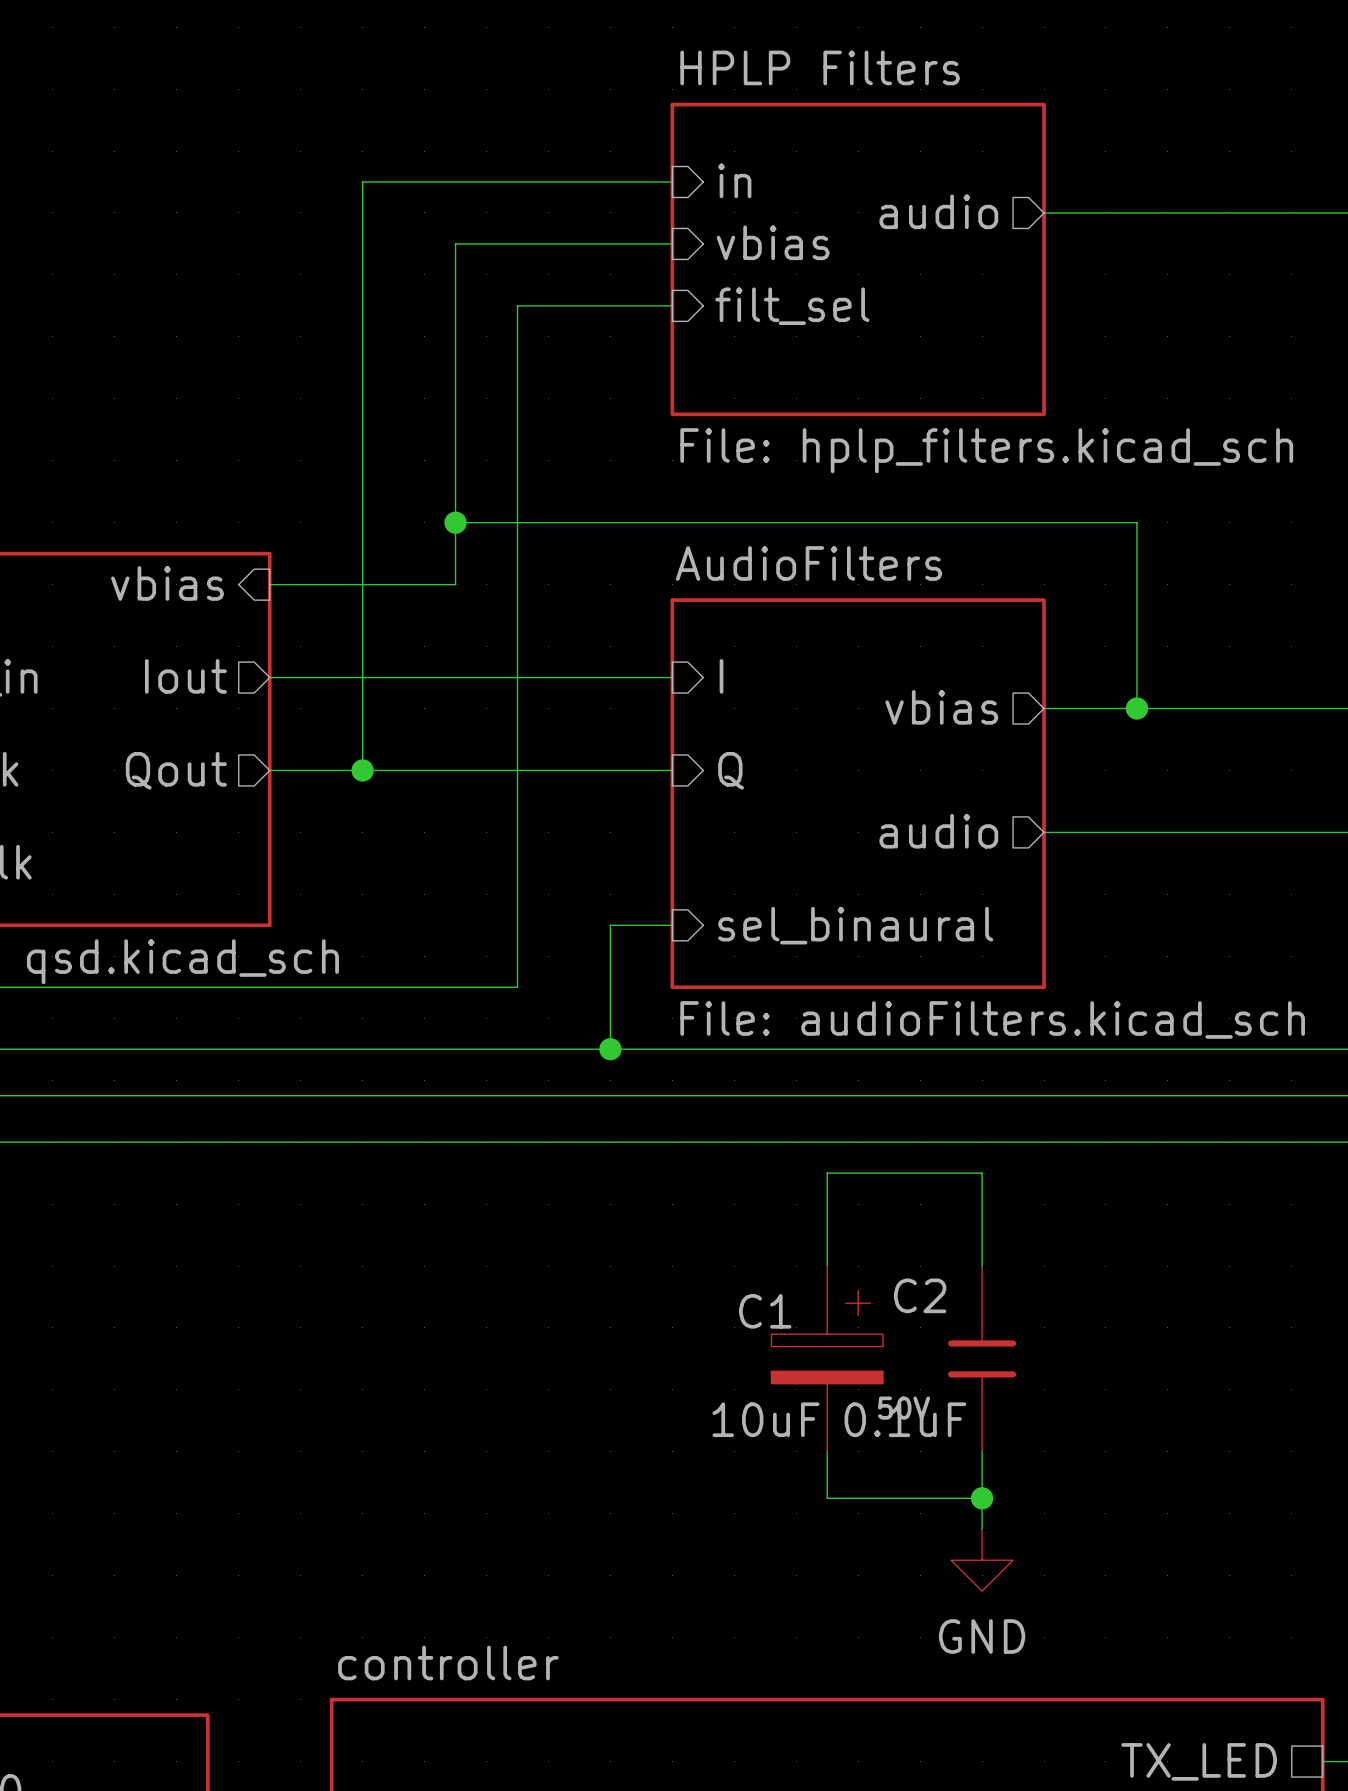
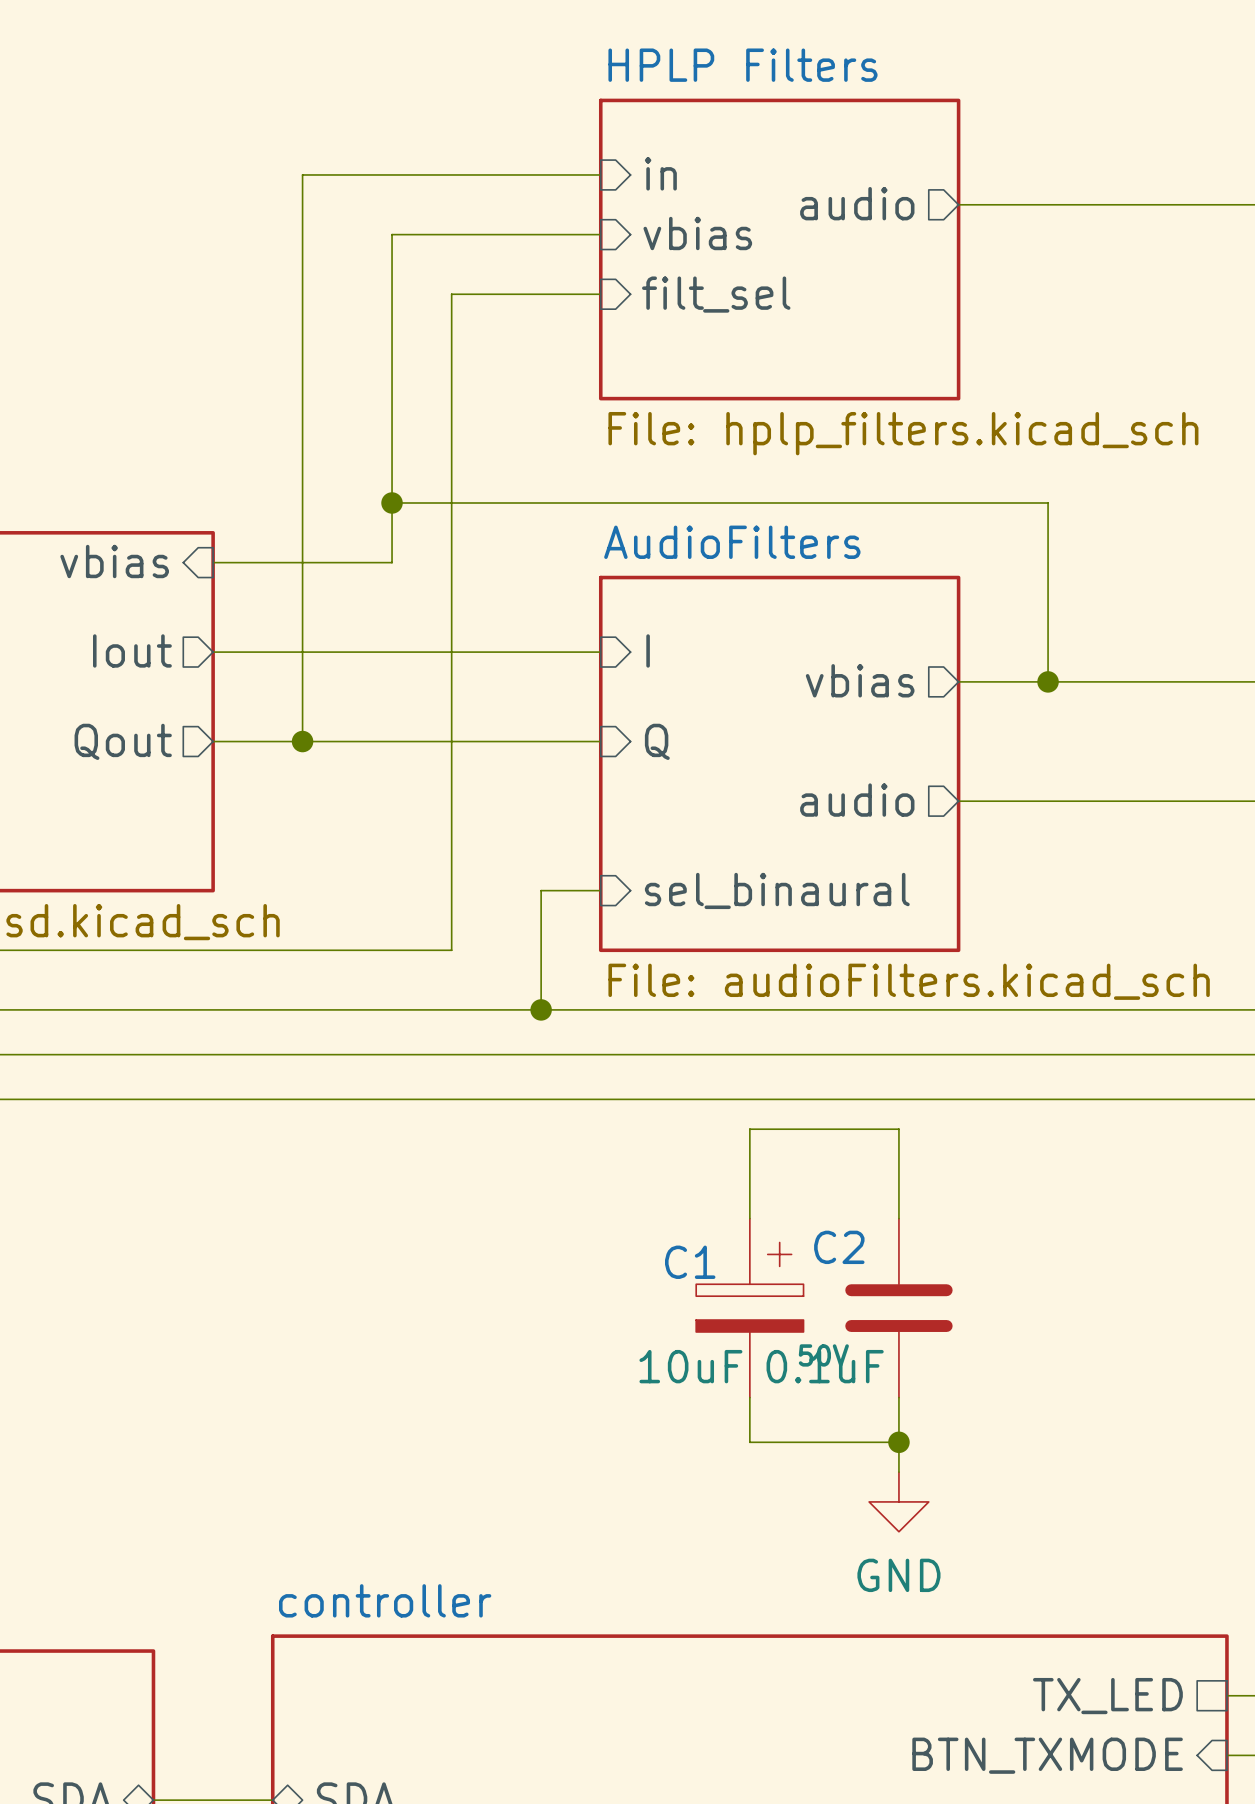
C2 symbol: [948, 1266, 1017, 1452] -> [845, 1218, 953, 1398]

